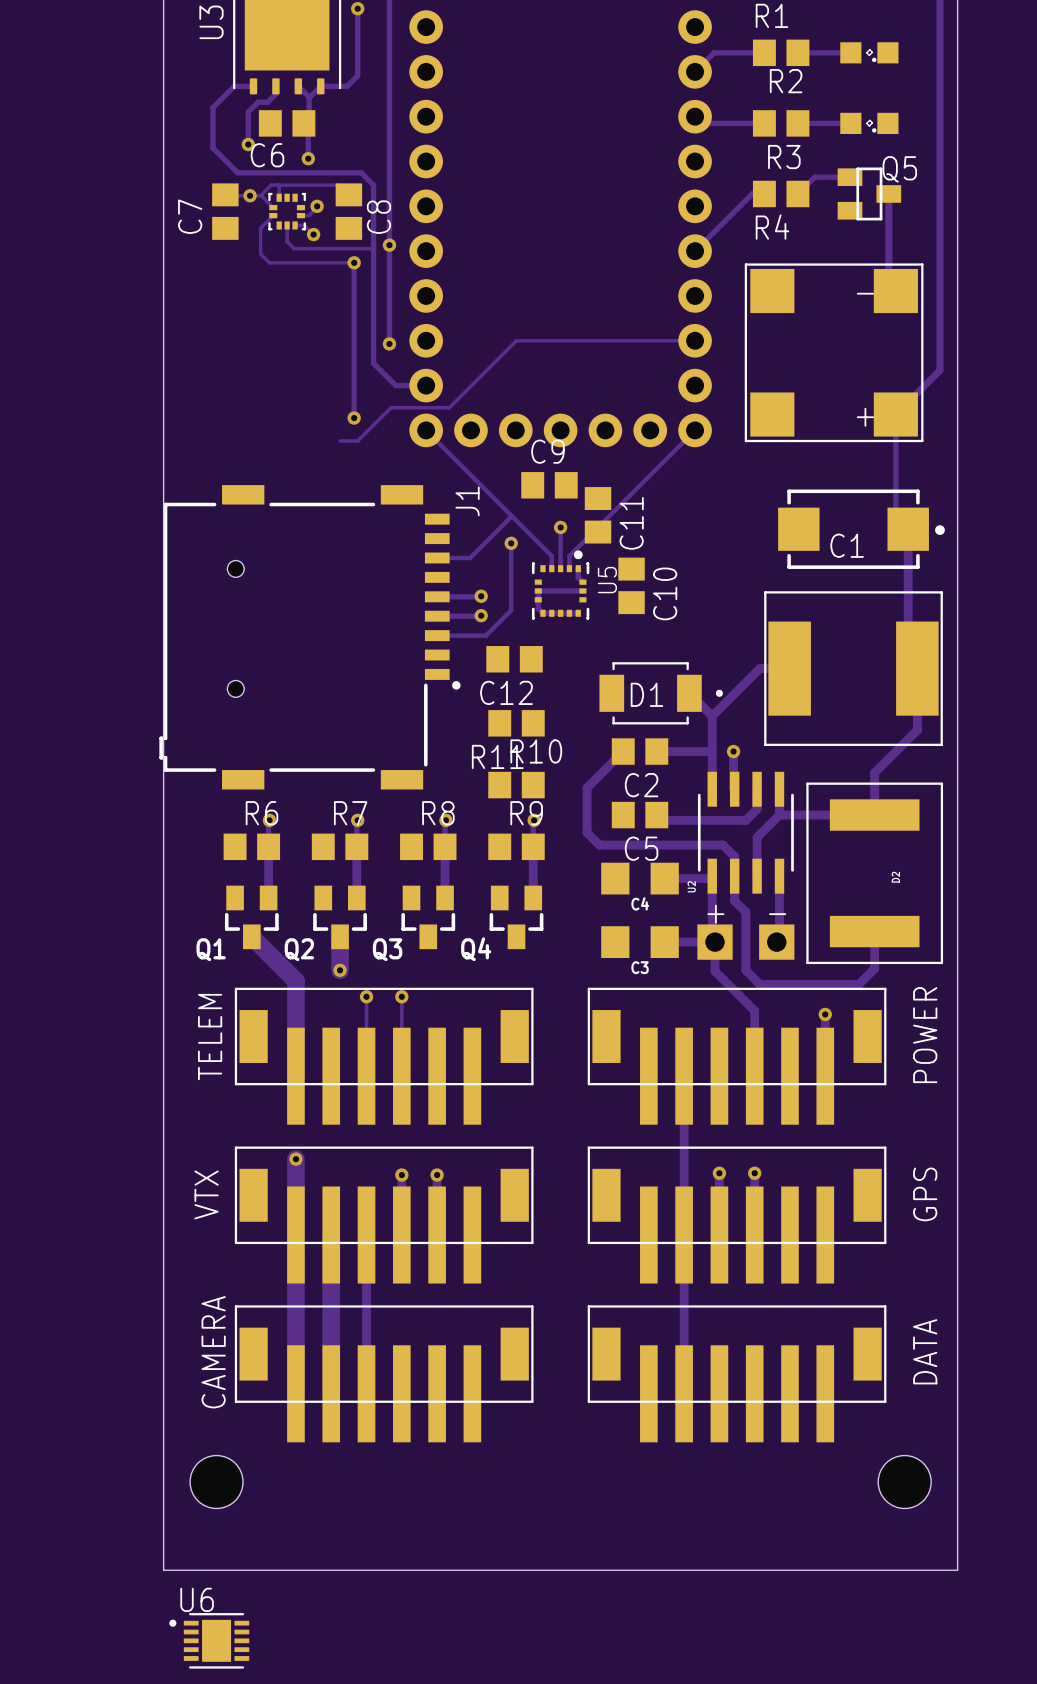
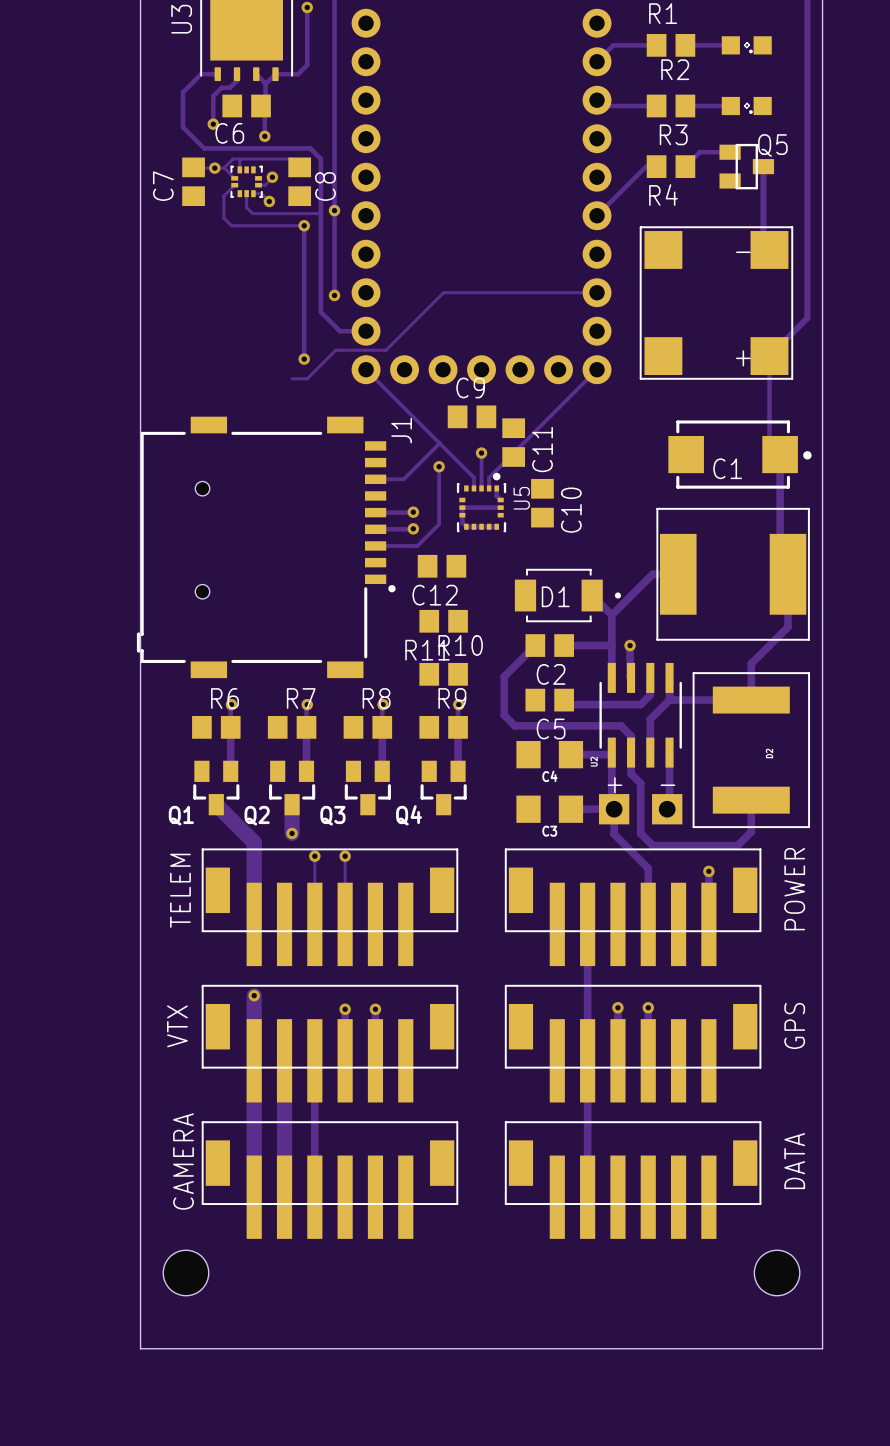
U6: (209, 1640) -> none

